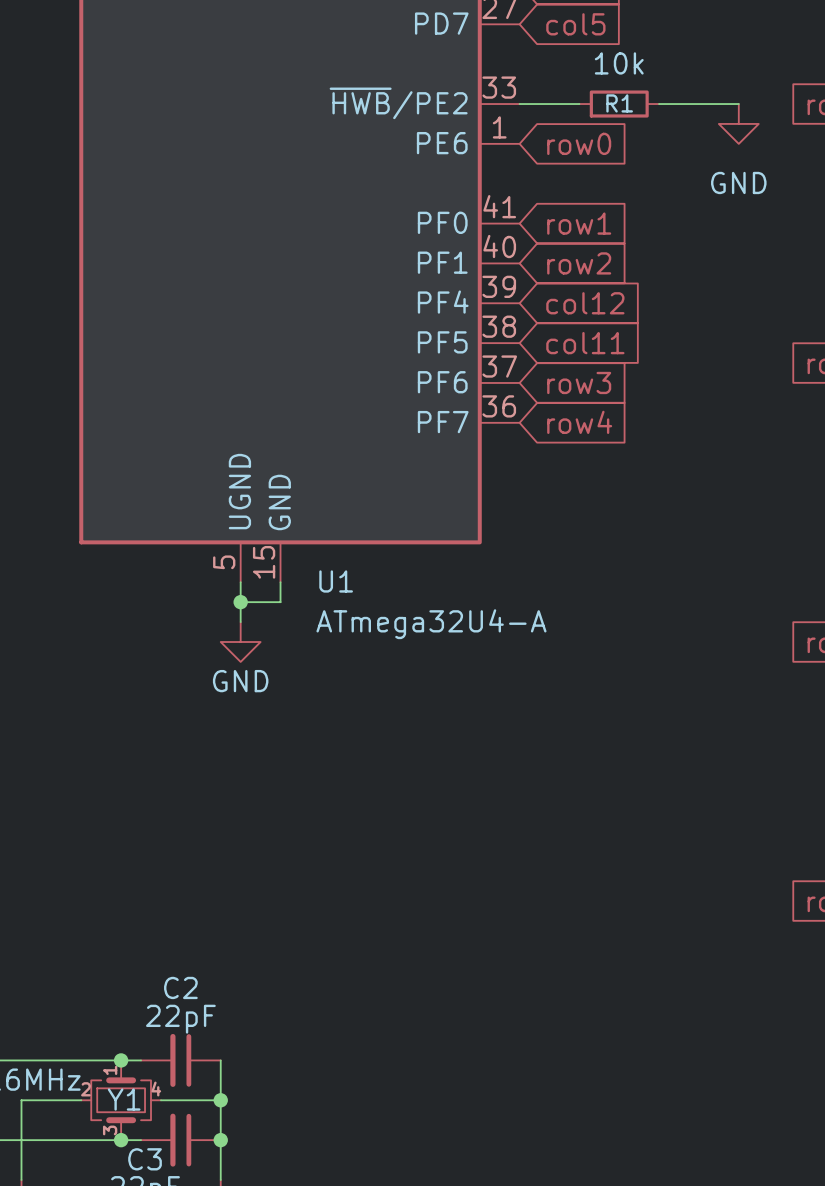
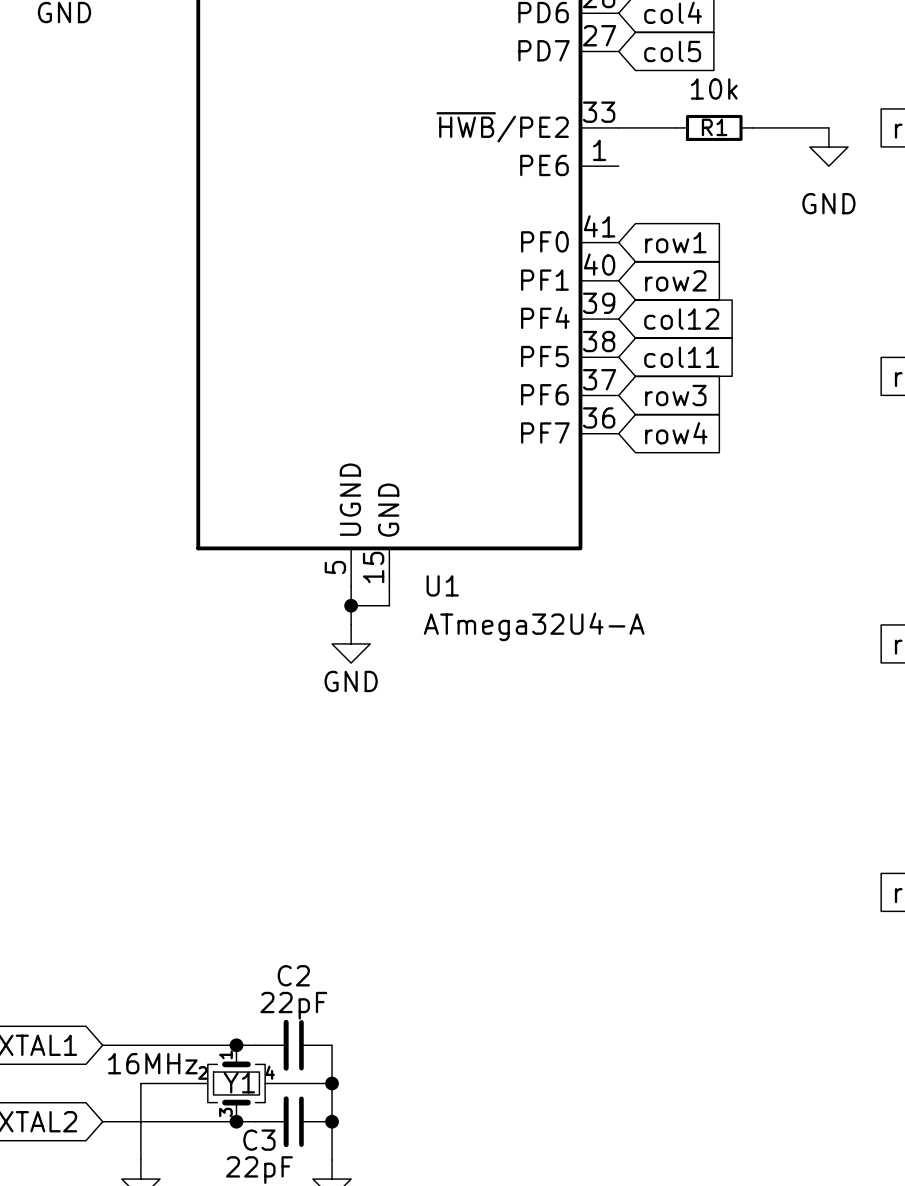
global label: row0 (579, 143) -> none

